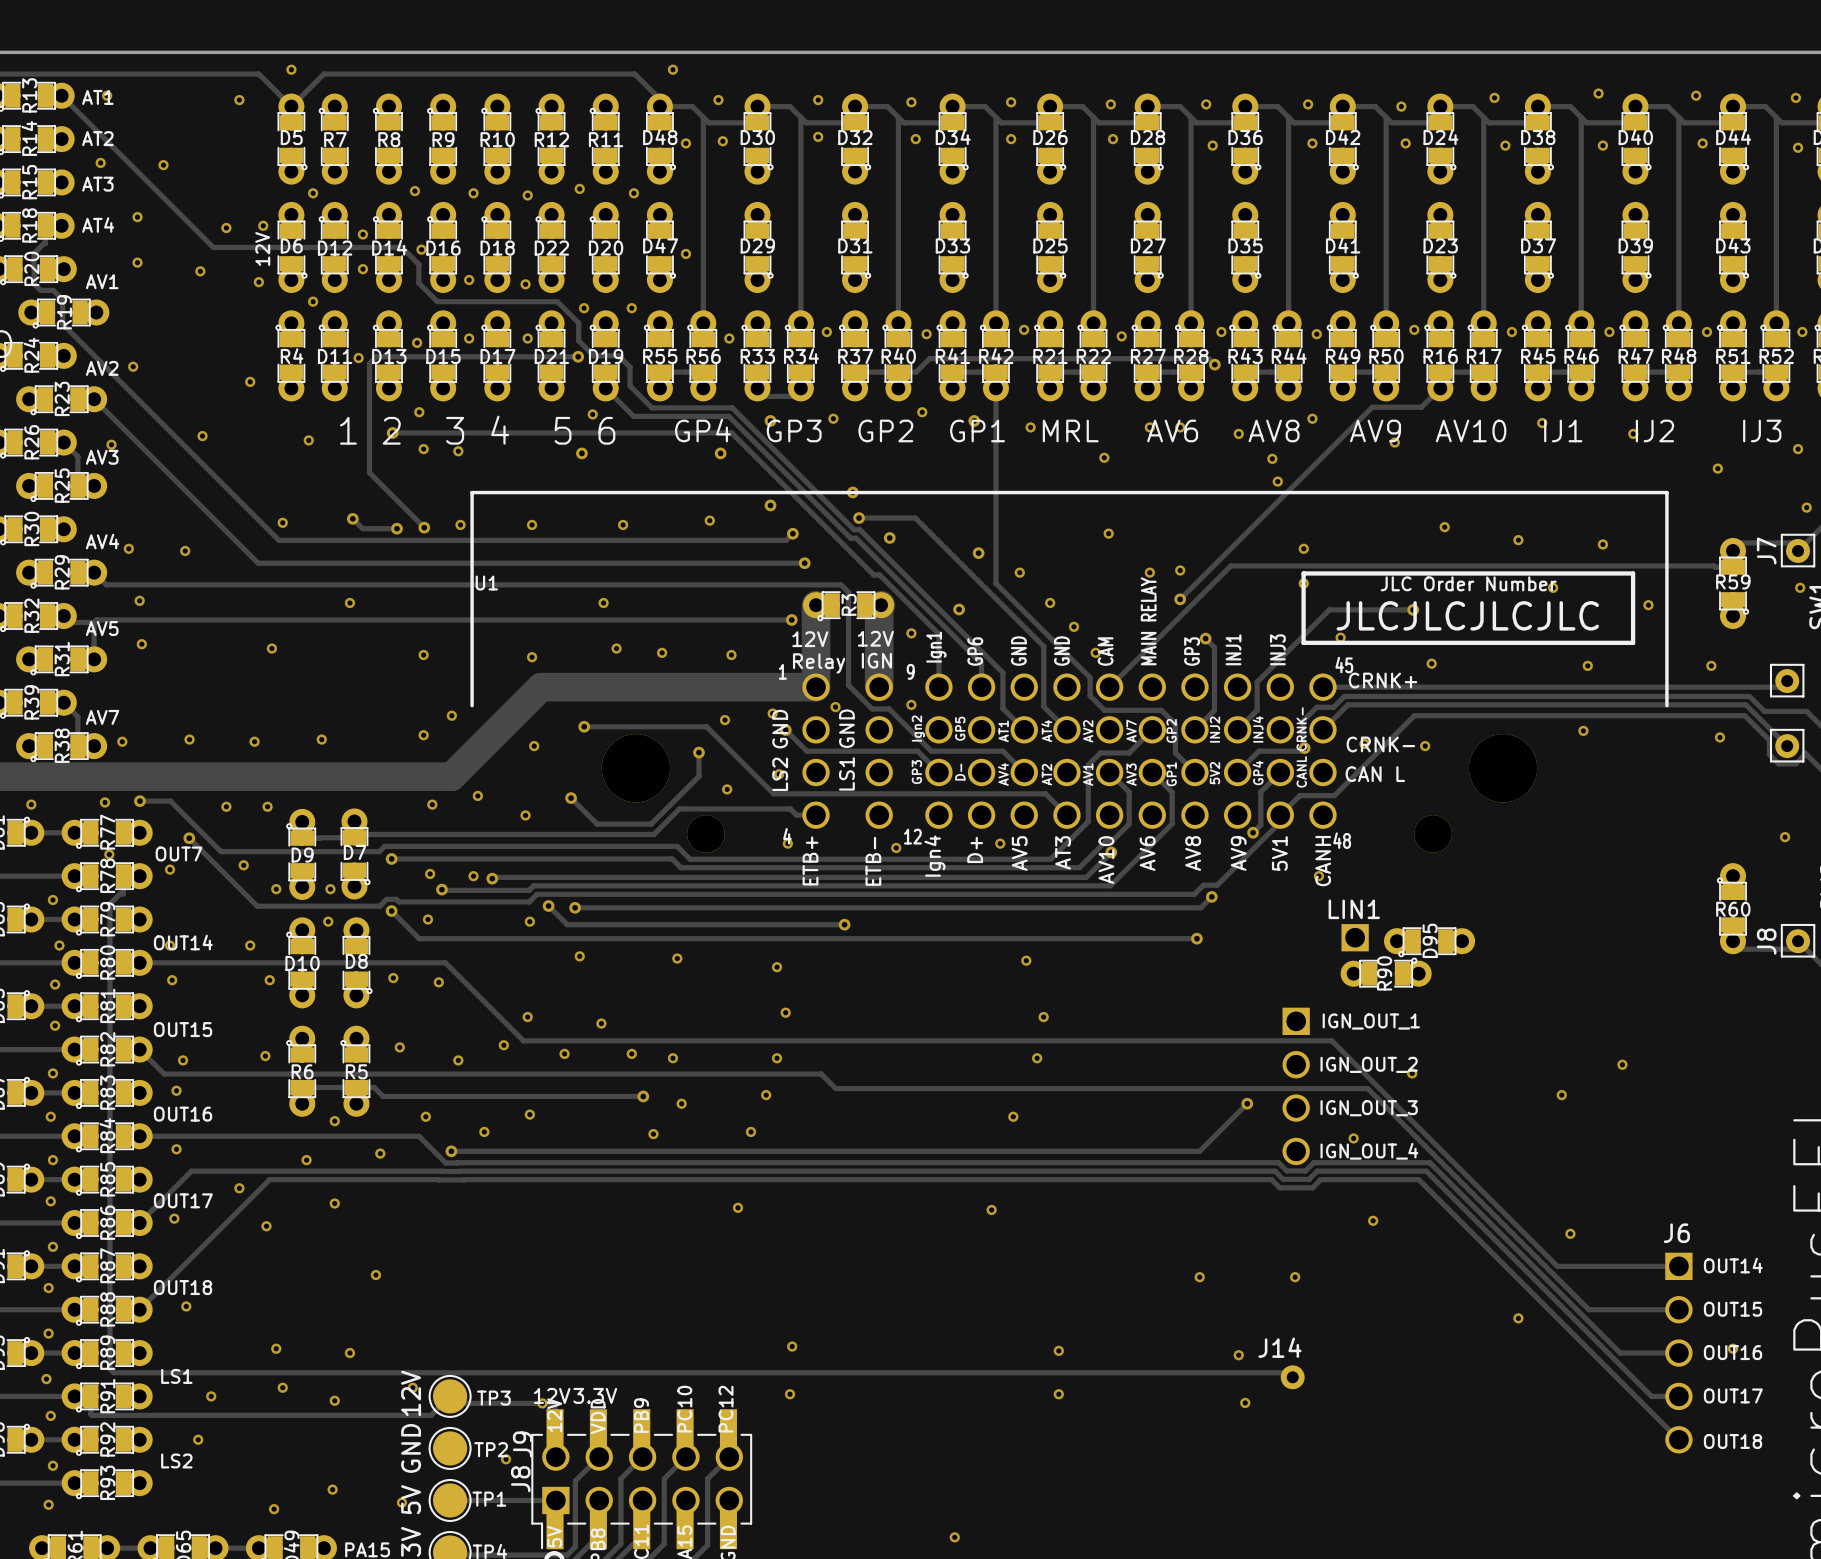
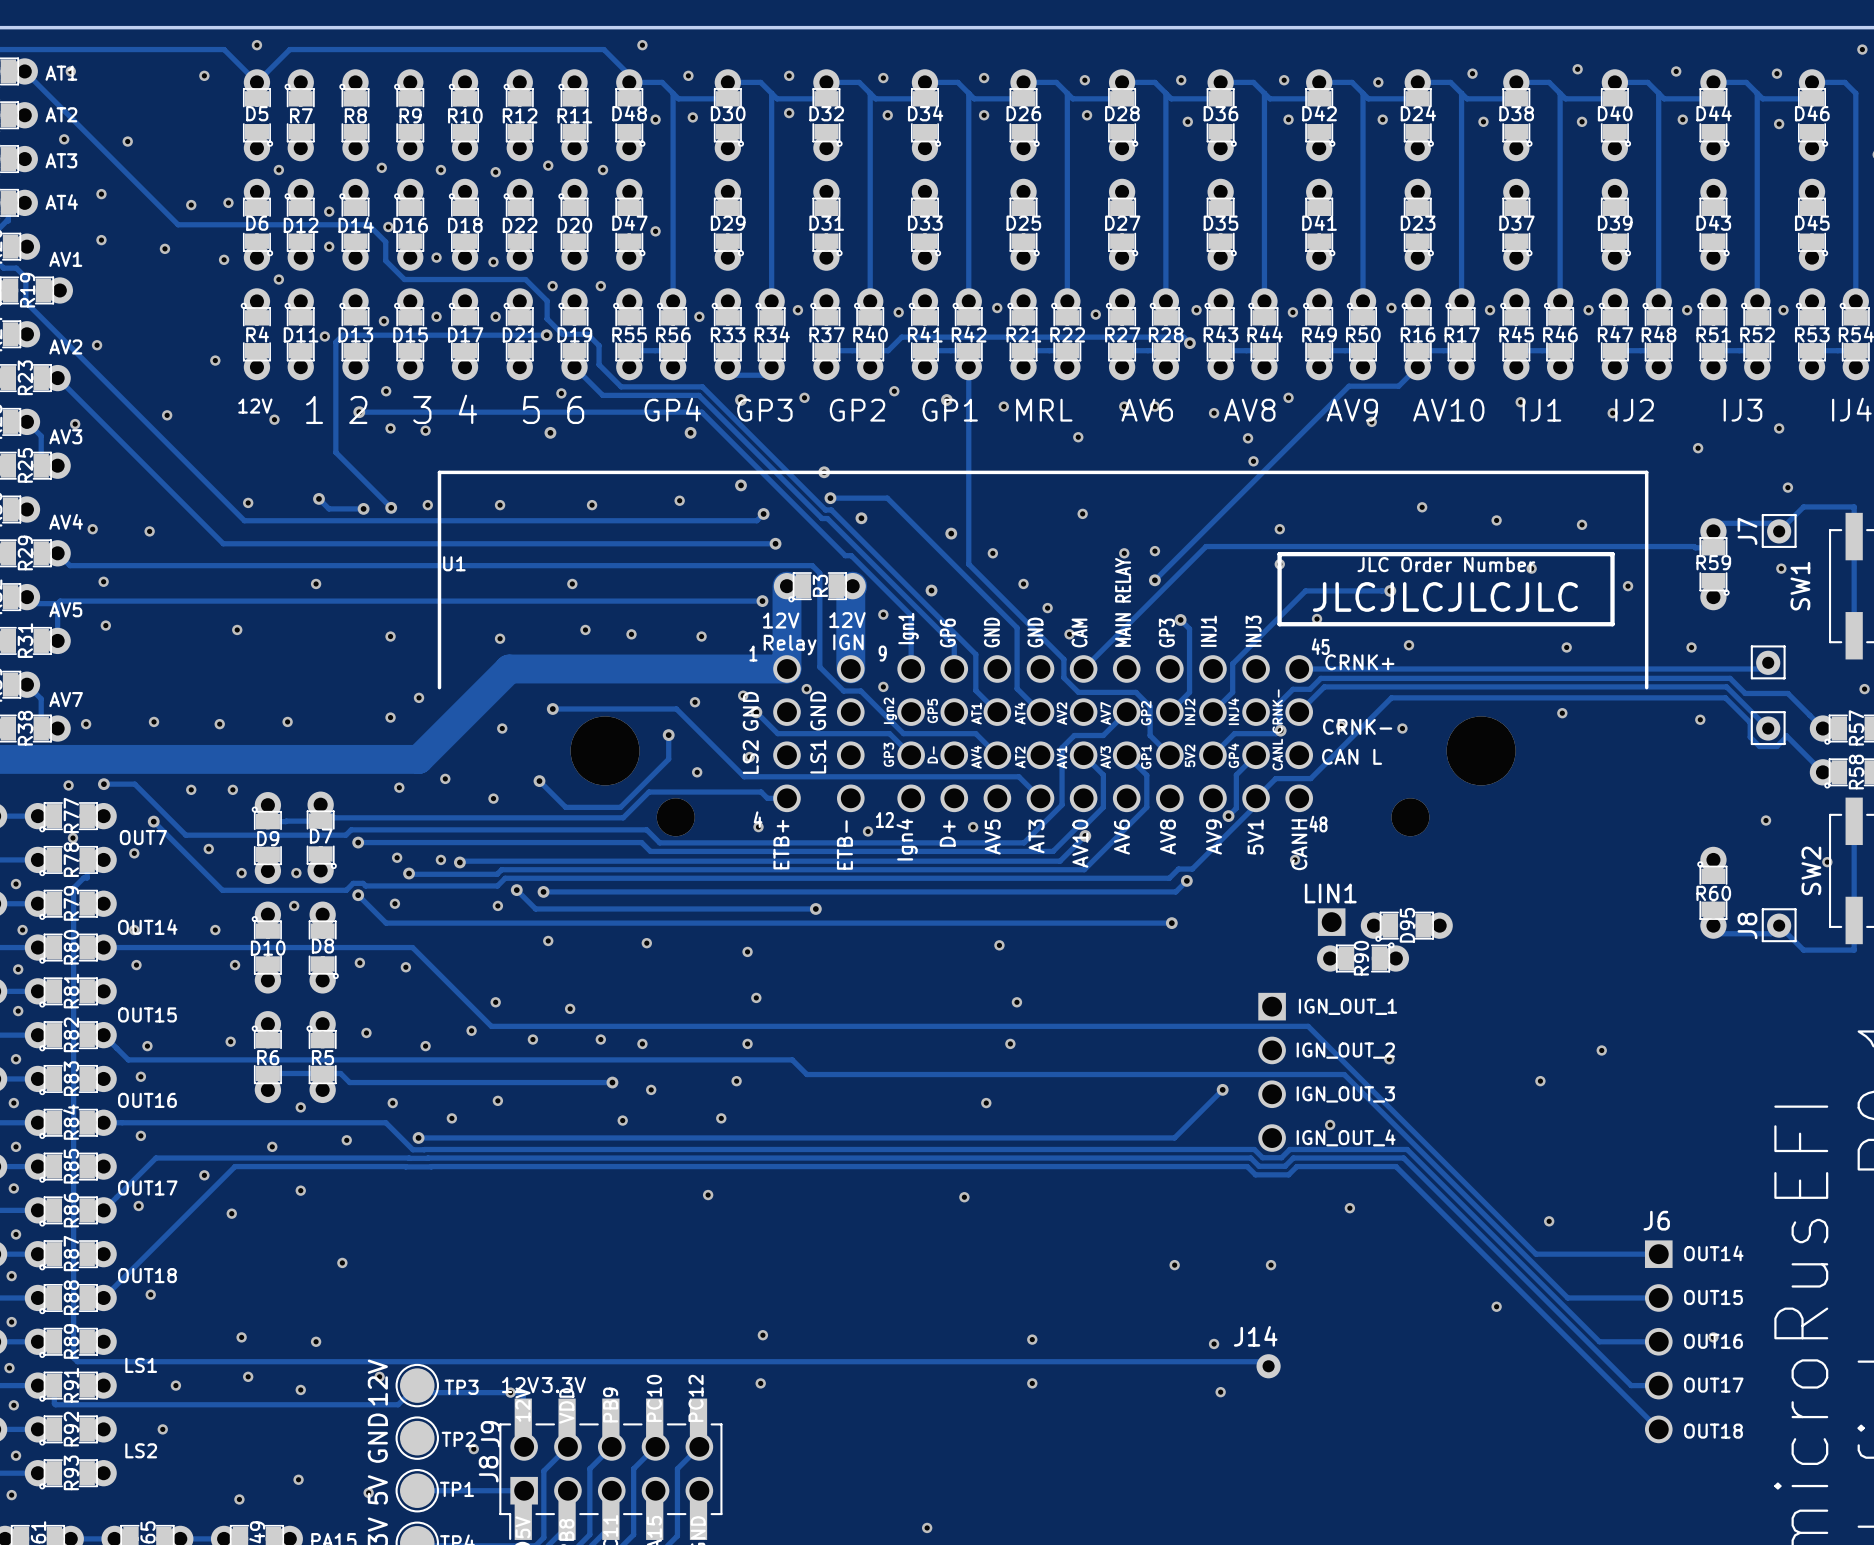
text rotation: 0° (262, 249) -> 90° clockwise (255, 406)
text position: 12V (262, 249) -> 12V (255, 406)

